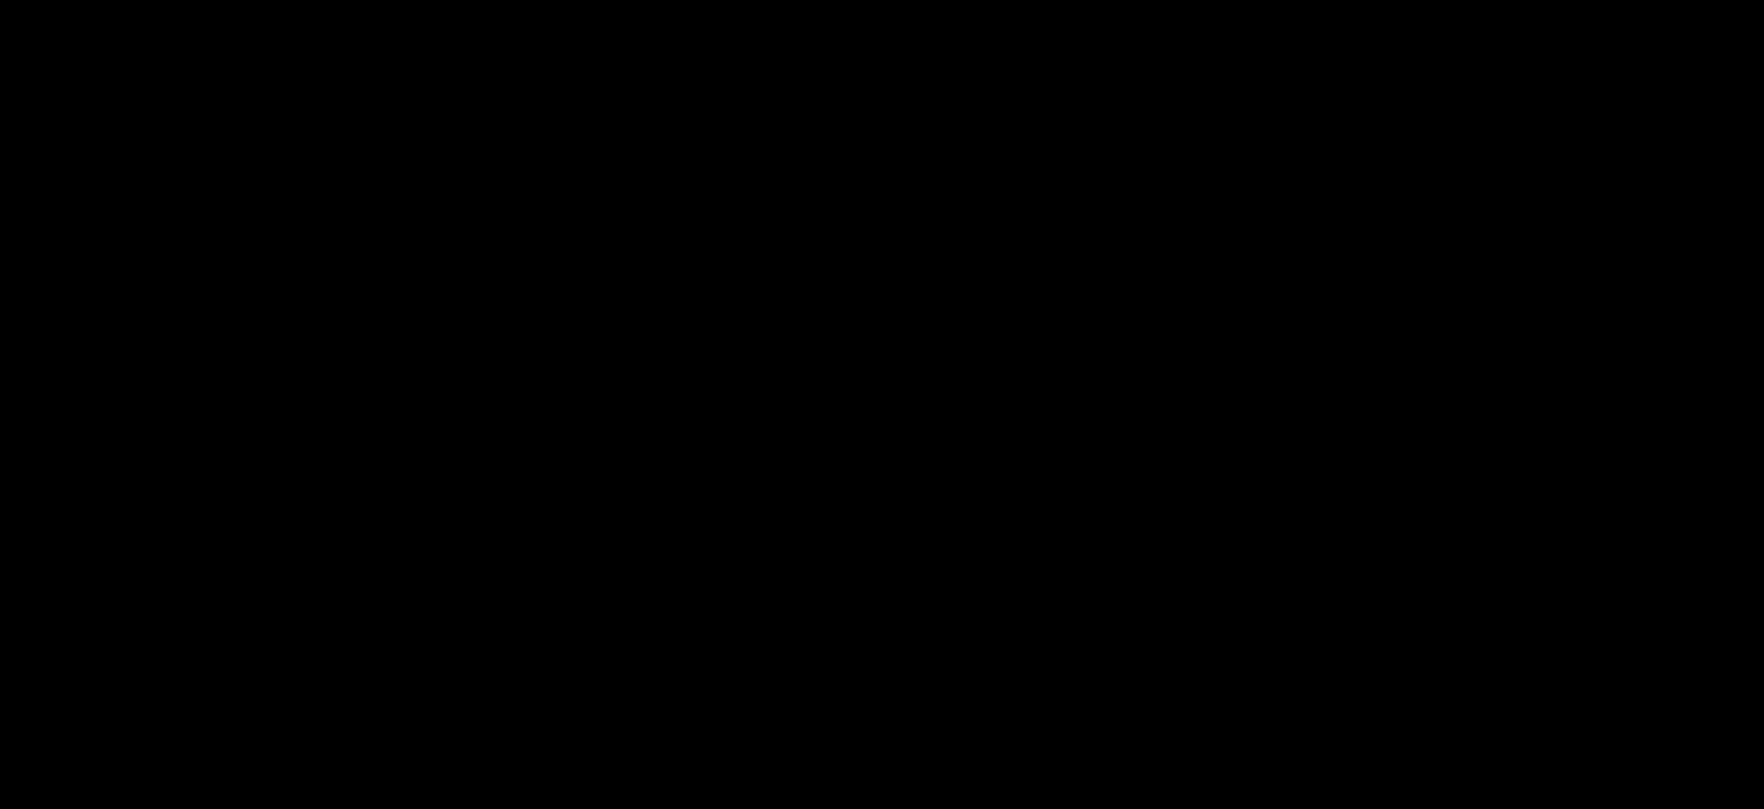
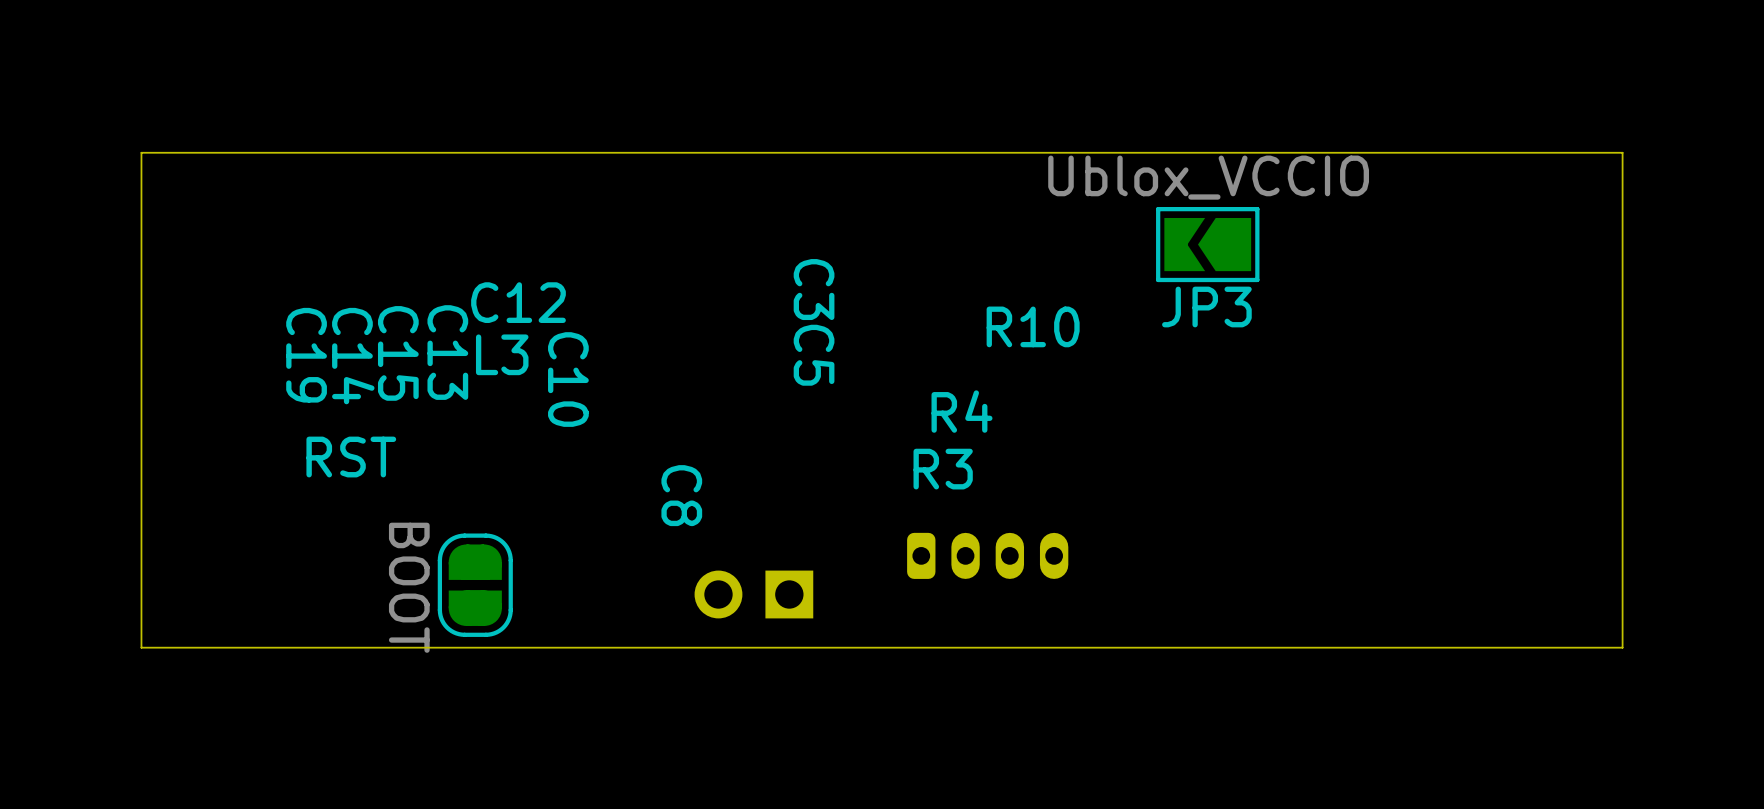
board edge: none -> (1622, 152) (1622, 647) (141, 647) (141, 152) (1622, 152)
JP3: none -> Ublox_VCCIO (1207, 244)
C3: none -> (814, 289)
C12: none -> (518, 302)
R10: none -> (1033, 326)
C13: none -> (447, 352)
C15: none -> (398, 353)
C19: none -> (306, 355)
C14: none -> (353, 356)
L3: none -> (502, 354)
C5: none -> (814, 355)
C10: none -> (568, 379)
R4: none -> (961, 411)
text: none -> RST (351, 457)
R3: none -> (943, 469)
C8: none -> (681, 495)
part: none -> (987, 555)
part: none -> BOOT (475, 585)
part: none -> (753, 594)

